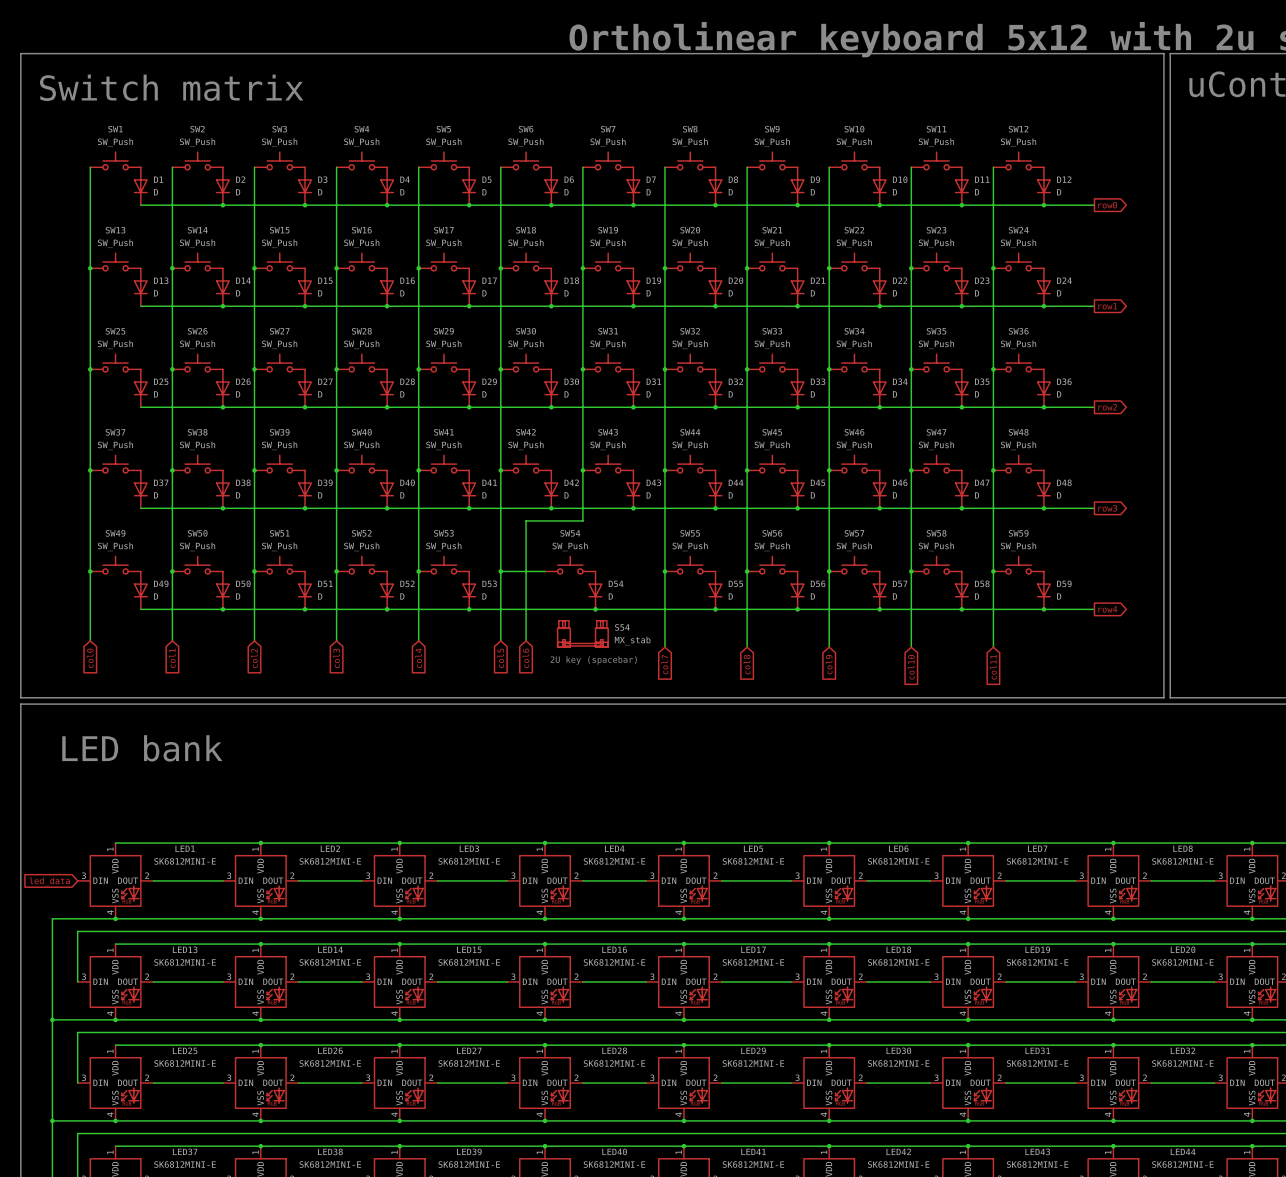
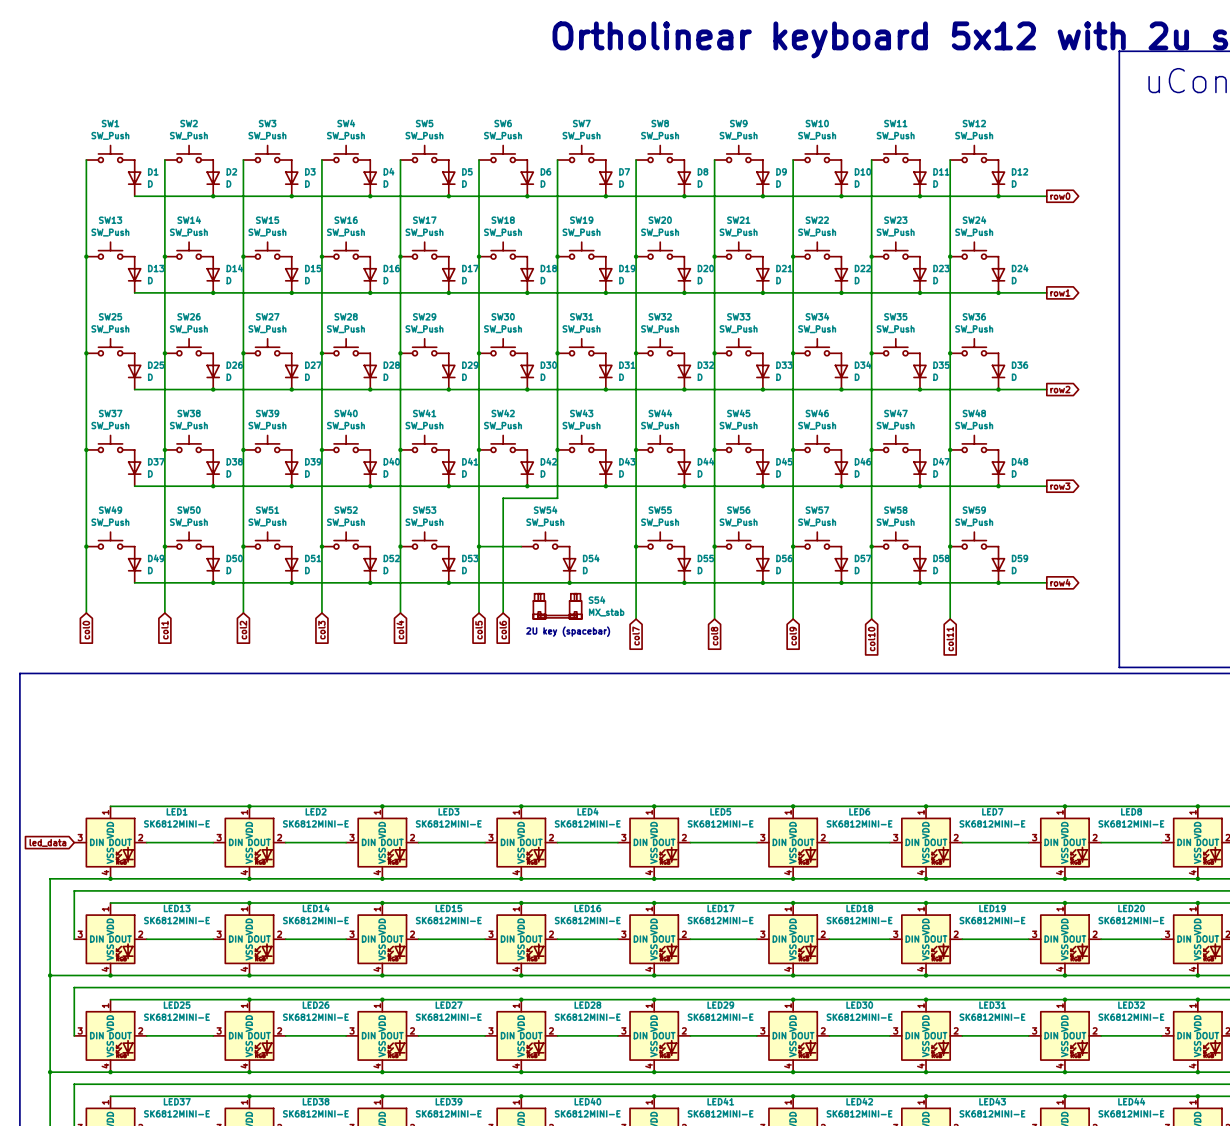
line: (20, 53) (20, 697) (1163, 697) (1163, 53) (20, 53) -> none
text: Switch matrix (171, 87) -> none
text: LED bank (142, 748) -> none

